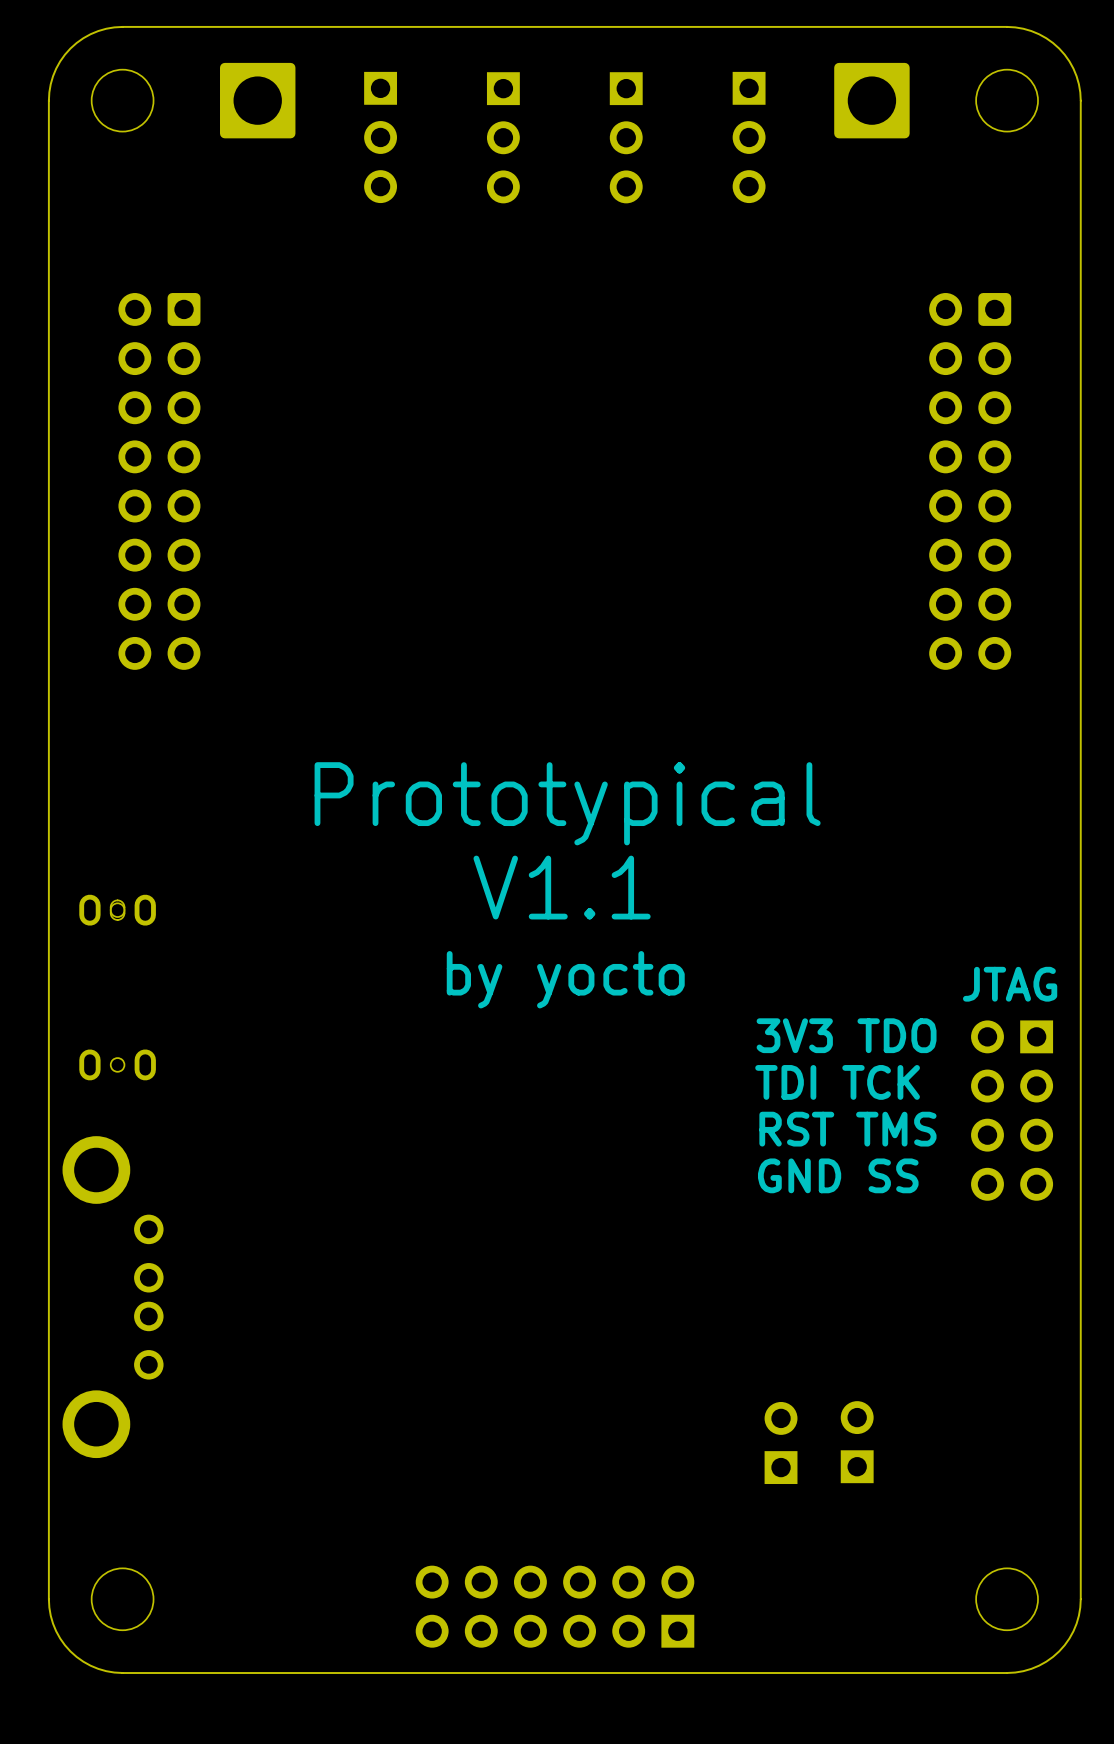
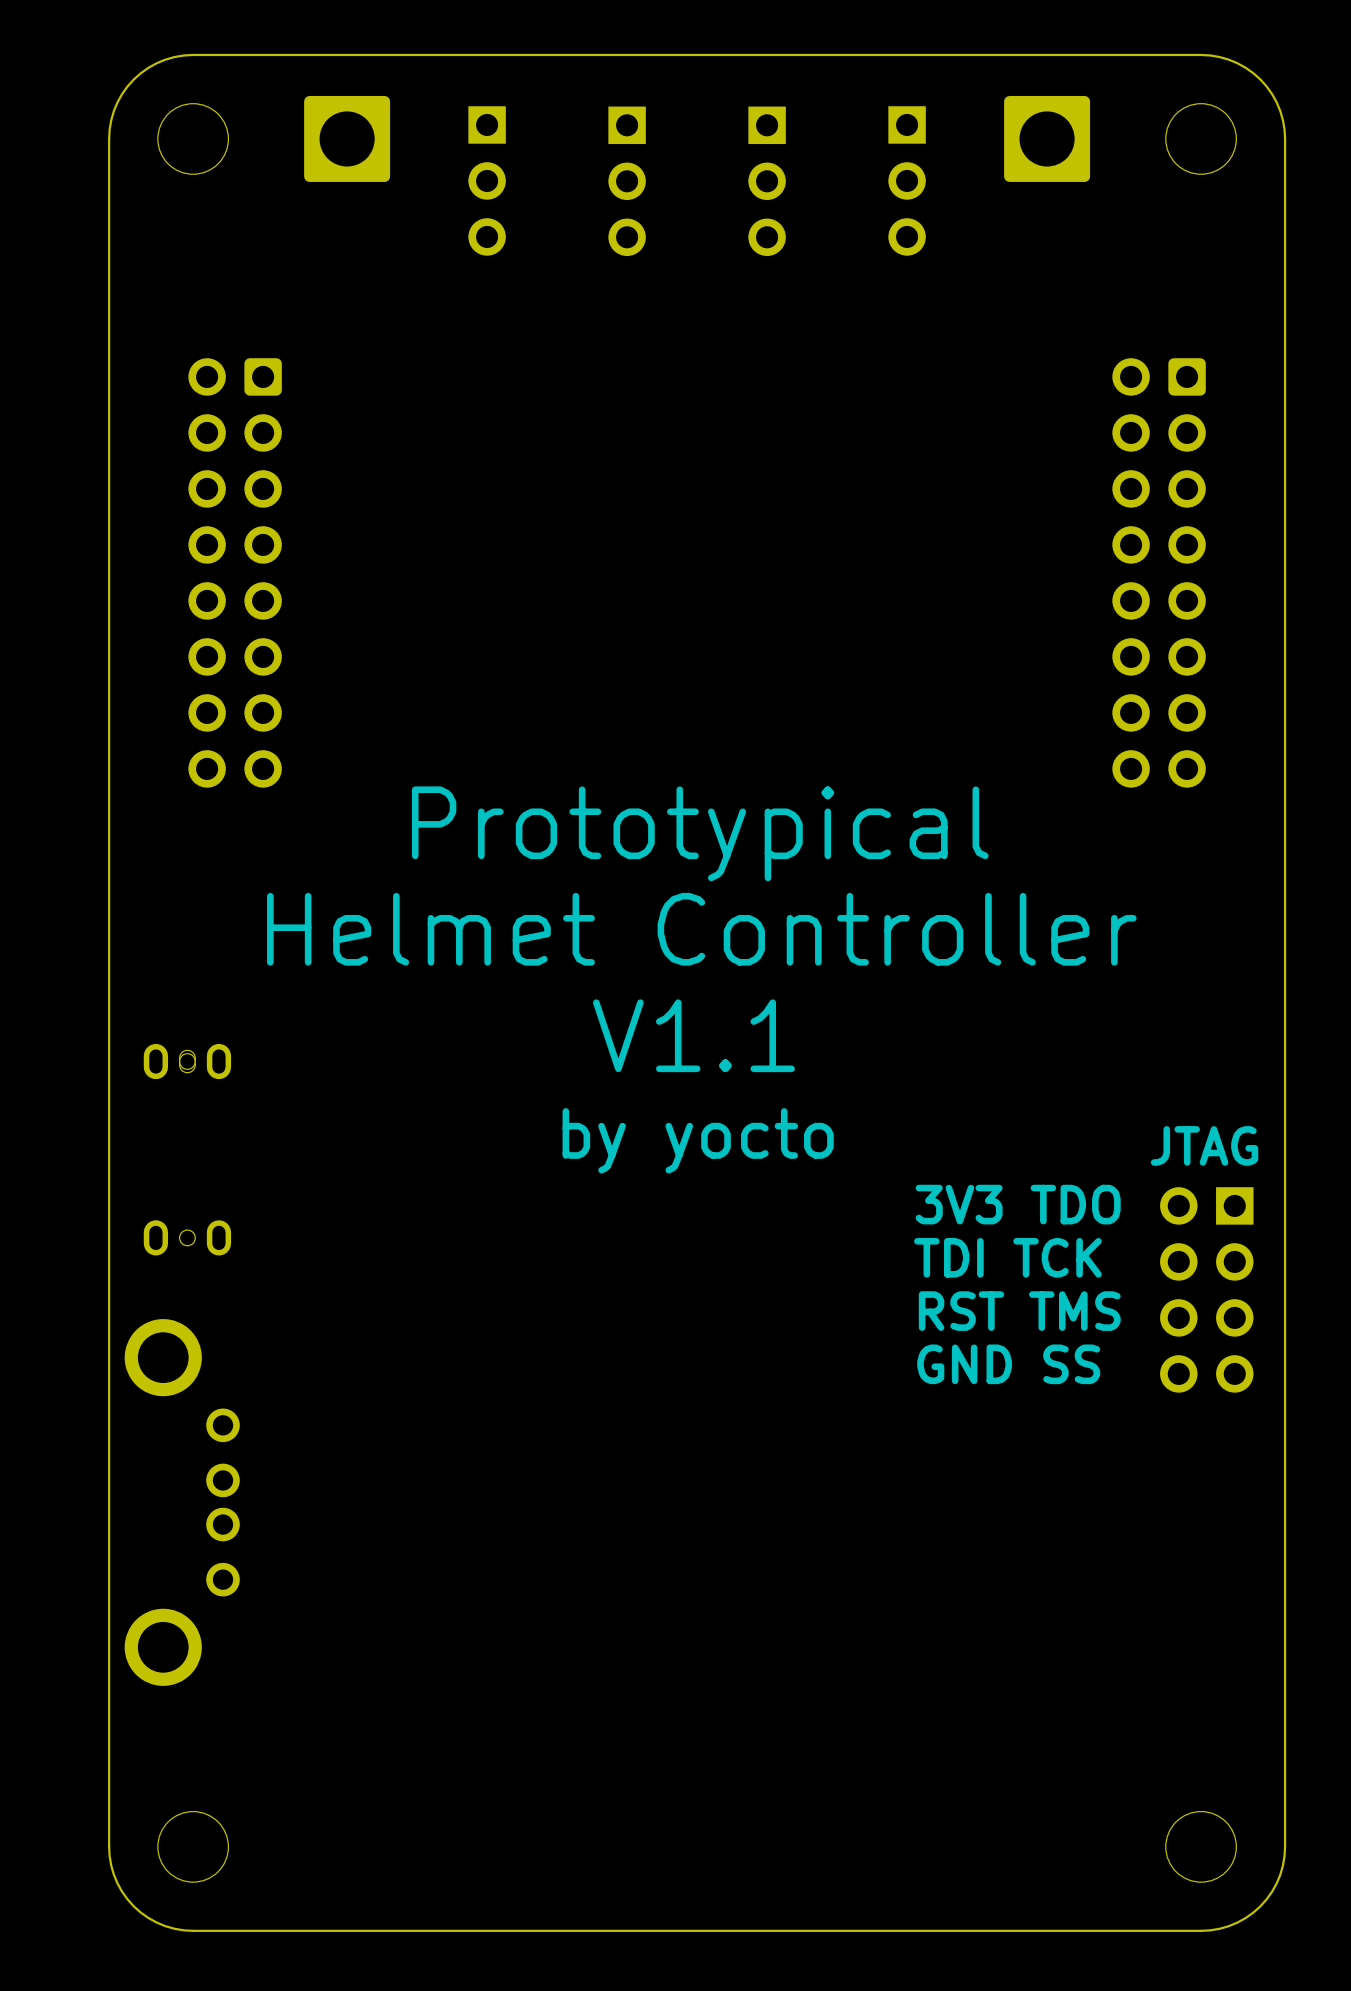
text: none -> Prototypical (700, 833)
text: Prototypical (567, 803) -> Helmet Controller (701, 929)
part: (857, 1442) -> none
part: (781, 1443) -> none
part: (555, 1606) -> none

